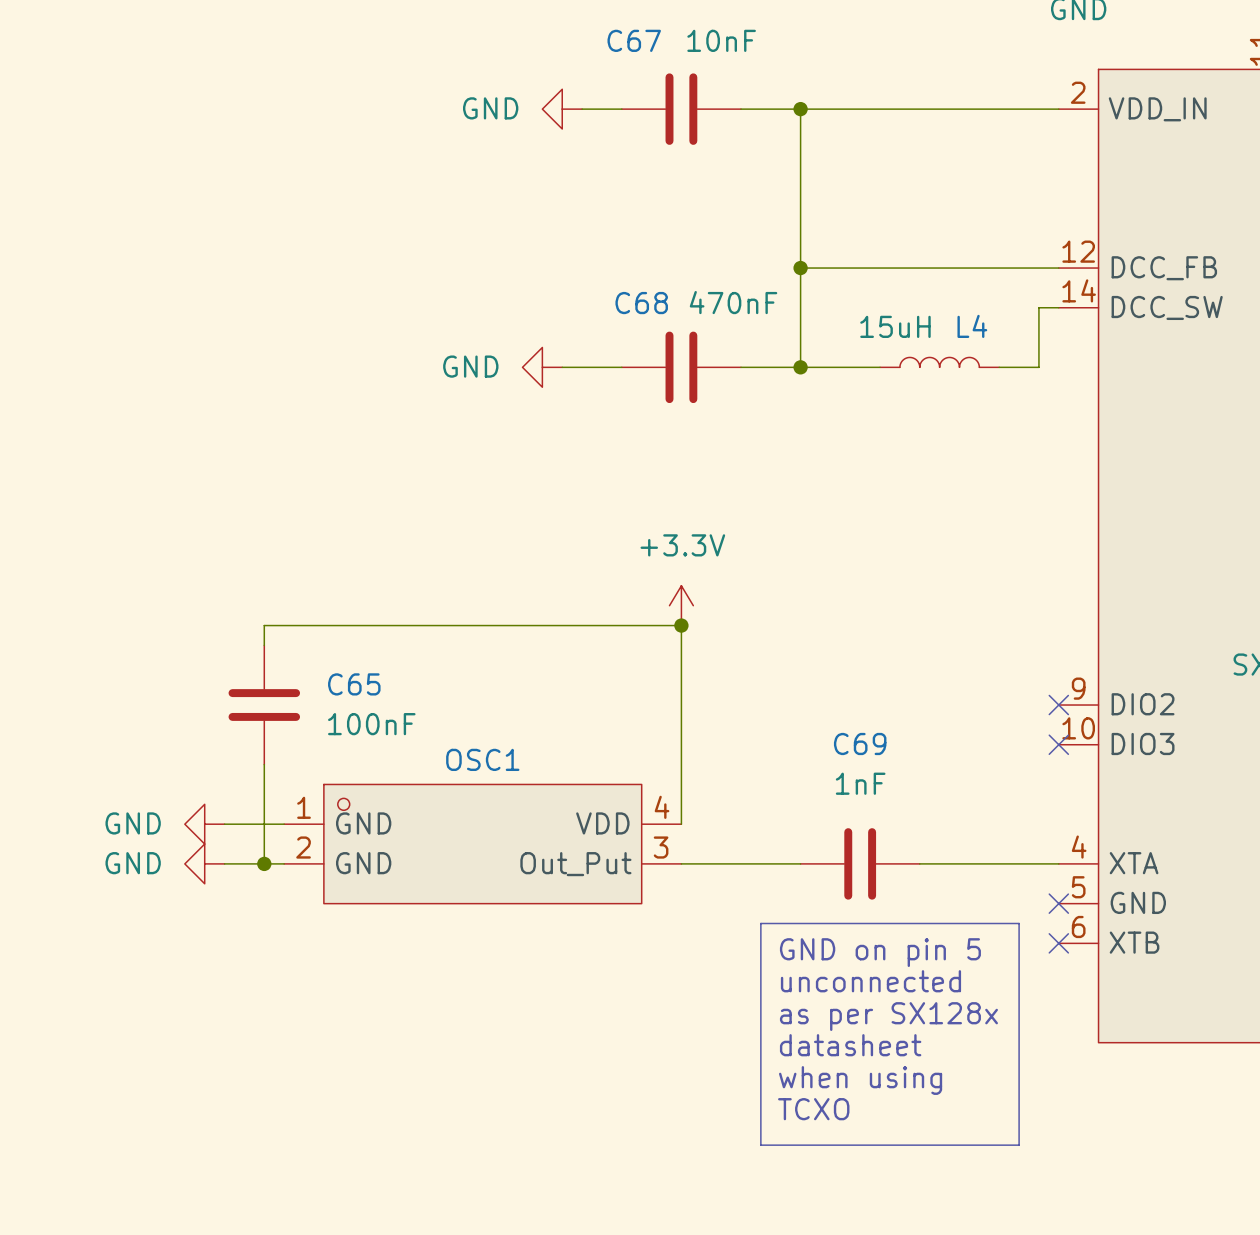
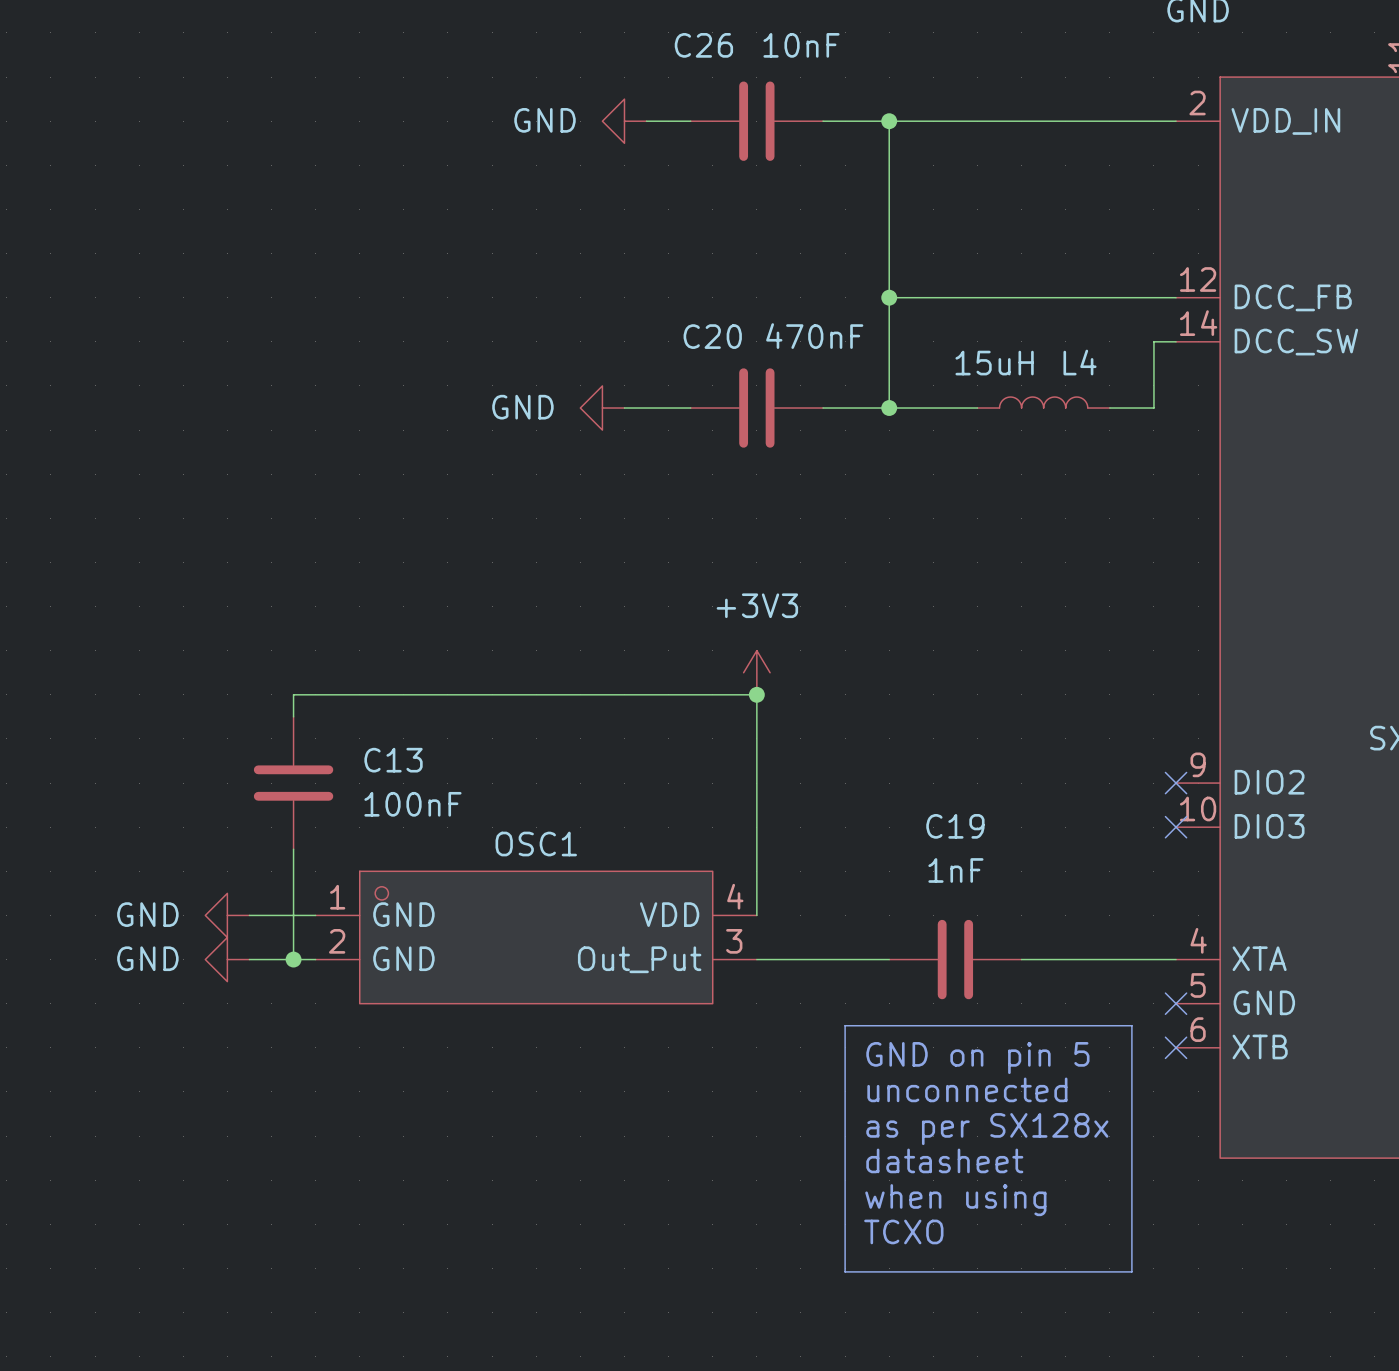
C67 name: C67 (634, 40) -> C26 (703, 45)
C68 name: C68 (641, 303) -> C20 (712, 336)
power symbol: +3.3V (681, 605) -> +3V3 (756, 672)
C65 name: C65 (354, 684) -> C13 (393, 760)
C69 name: C69 (860, 743) -> C19 (955, 826)

